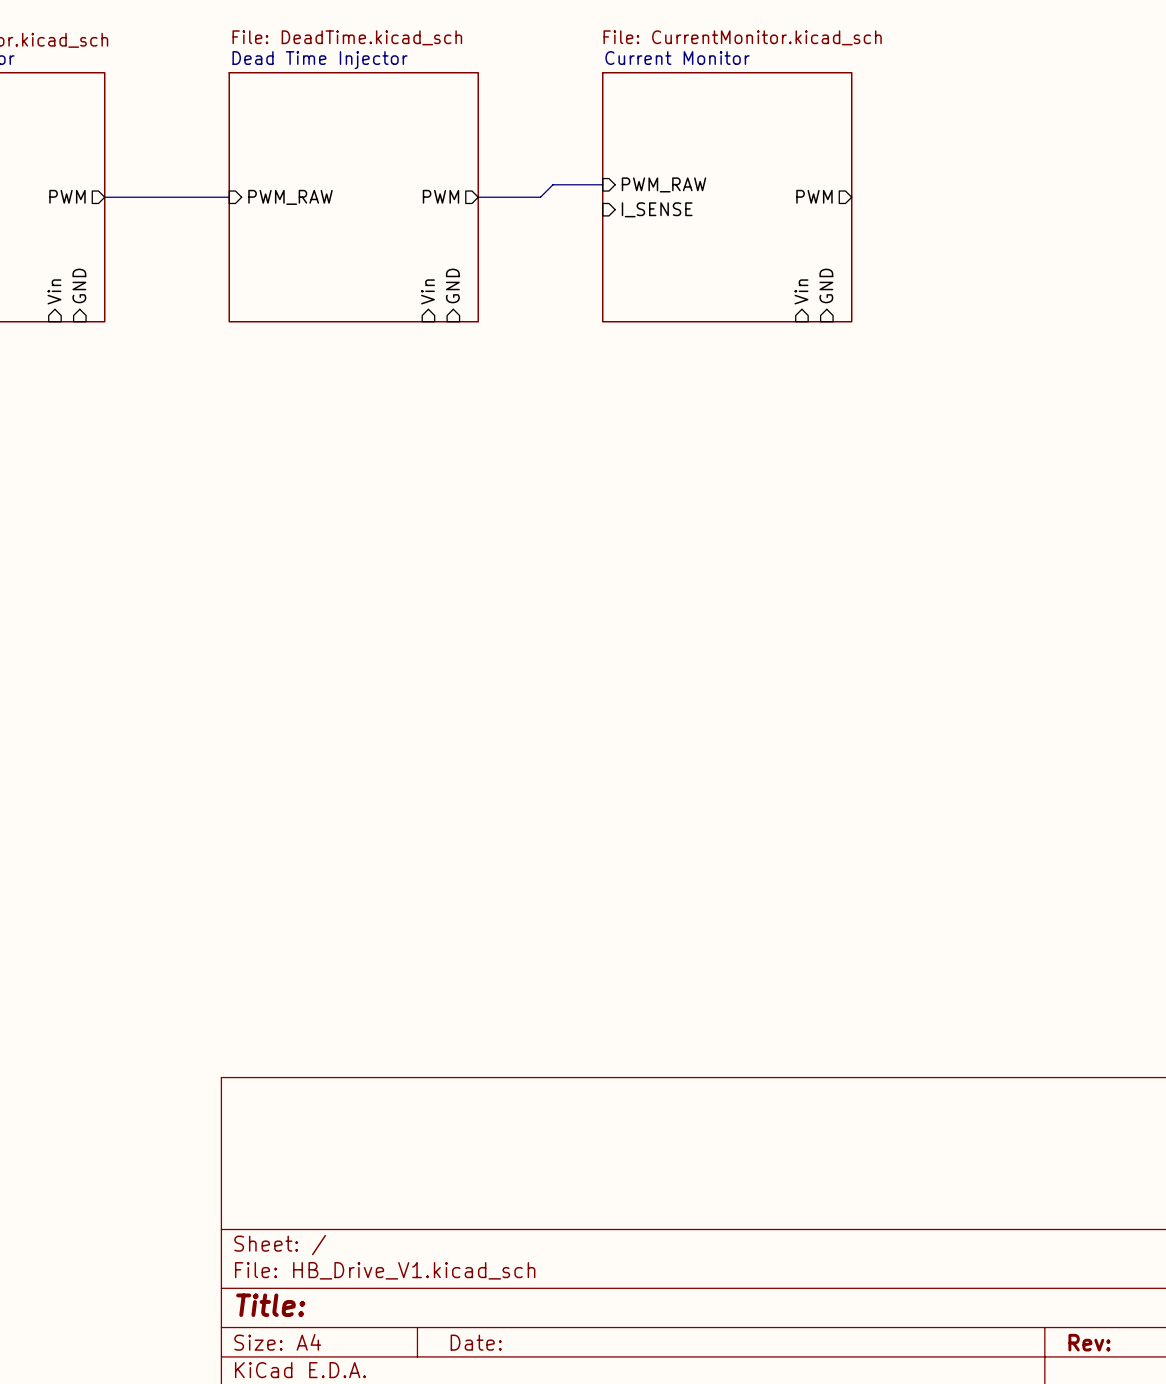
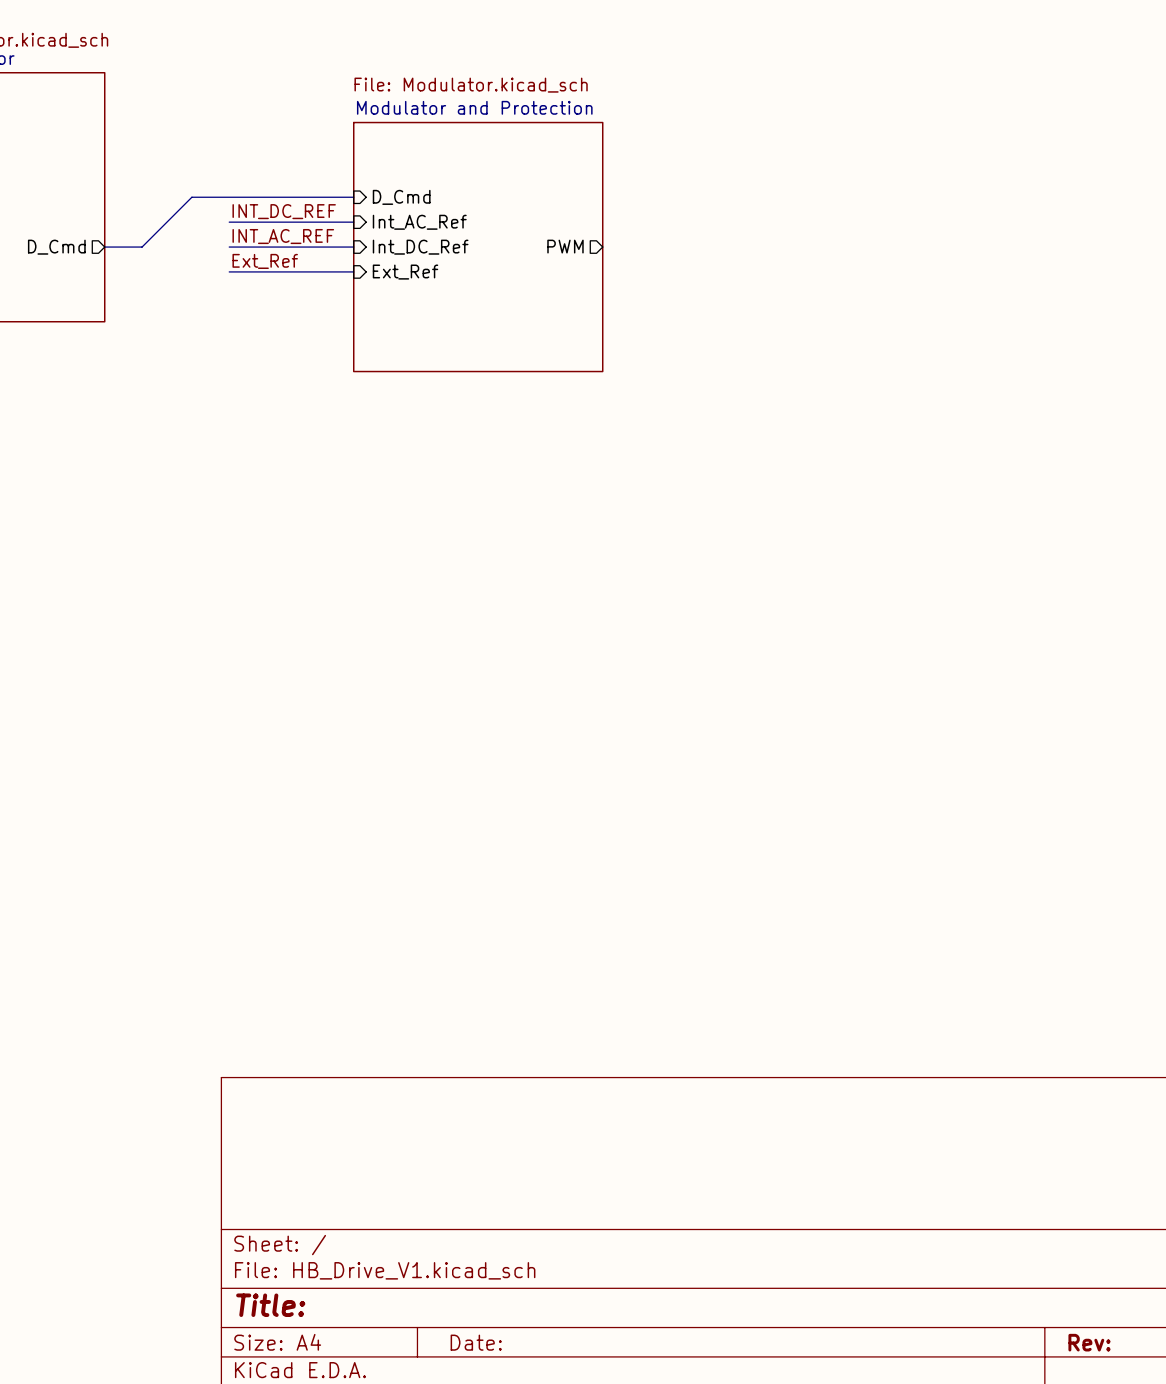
wire: (602, 184) (552, 184) (540, 197) (478, 197) -> none
sheet pin: PWM_RAW (663, 184) -> none
sheet pin: PWM (67, 196) -> none
sheet pin: PWM (440, 196) -> none
sheet pin: PWM (814, 196) -> none
wire: (104, 197) (191, 197) -> (104, 247) (142, 247) (191, 197)
wire: none -> (229, 197) (353, 197)
sheet pin: PWM_RAW (290, 197) -> none
sheet Dead Time Injector: File: DeadTime.kicad_sch (353, 197) -> none
sheet pin: none -> D_Cmd (401, 197)
sheet Current Monitor: File: CurrentMonitor.kicad_sch (727, 197) -> none
sheet pin: I_SENSE (657, 209) -> none
label: none -> INT_DC_REF (284, 211)
wire: none -> (229, 222) (353, 222)
sheet pin: none -> Int_AC_Ref (419, 222)
label: none -> INT_AC_REF (283, 236)
sheet pin: none -> PWM (565, 246)
sheet pin: none -> D_Cmd (56, 247)
wire: none -> (229, 247) (353, 247)
sheet pin: none -> Int_DC_Ref (420, 247)
sheet Modulator and Protection: none -> File: Modulator.kicad_sch (478, 247)
label: none -> Ext_Ref (265, 261)
wire: none -> (229, 271) (353, 271)
sheet pin: none -> Ext_Ref (405, 272)
sheet pin: GND (79, 285) -> none
sheet pin: GND (452, 285) -> none
sheet pin: GND (826, 285) -> none
sheet pin: Vin (54, 291) -> none
sheet pin: Vin (427, 291) -> none
sheet pin: Vin (801, 291) -> none

